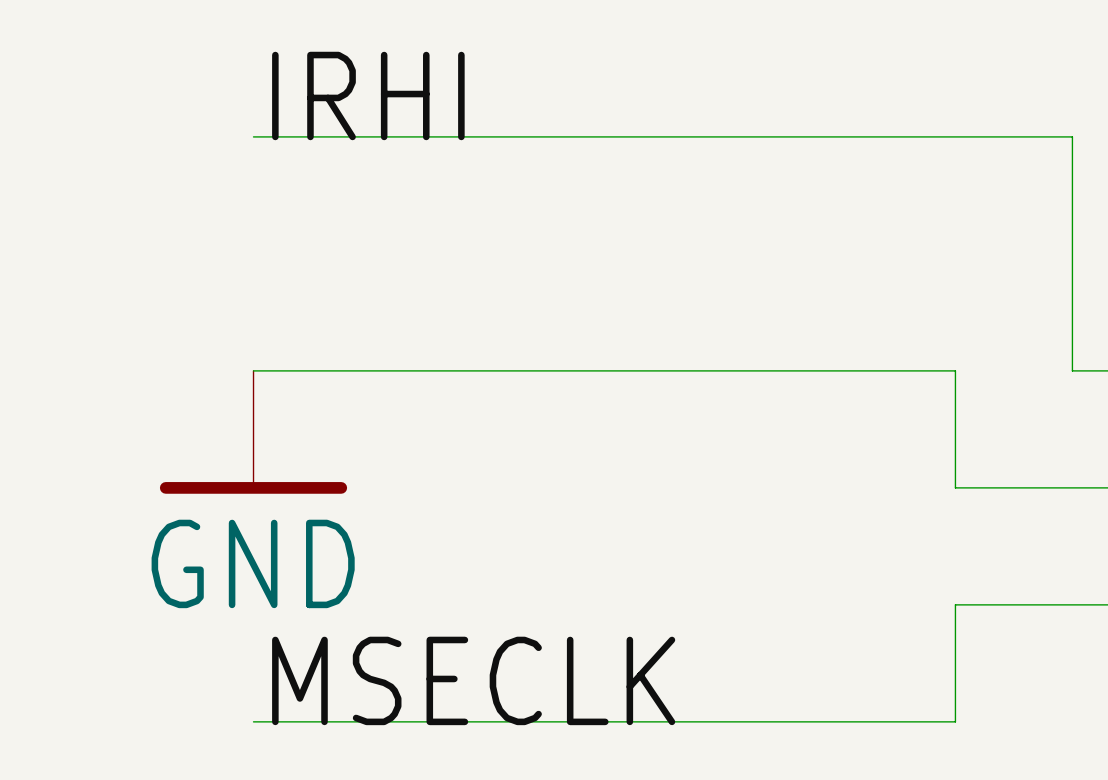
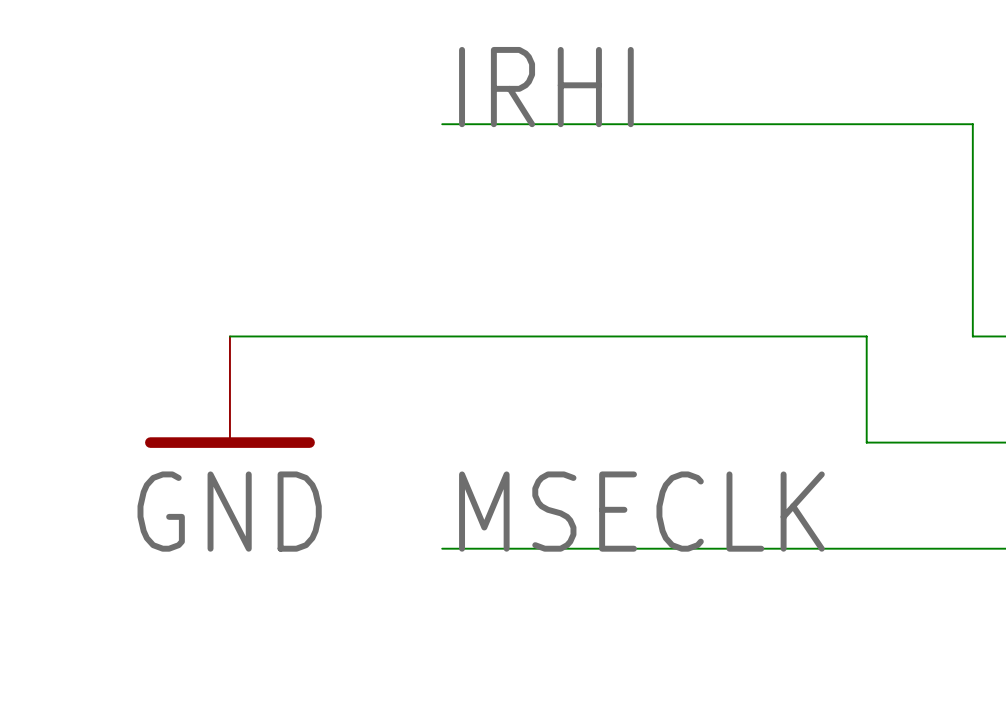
label position: IRHI (368, 95) -> IRHI (546, 87)
wire: (253, 136) (487, 136) -> none
wire: (955, 604) (955, 721) (253, 721) -> (866, 548) (442, 548)
label position: MSECLK (473, 680) -> MSECLK (641, 511)

